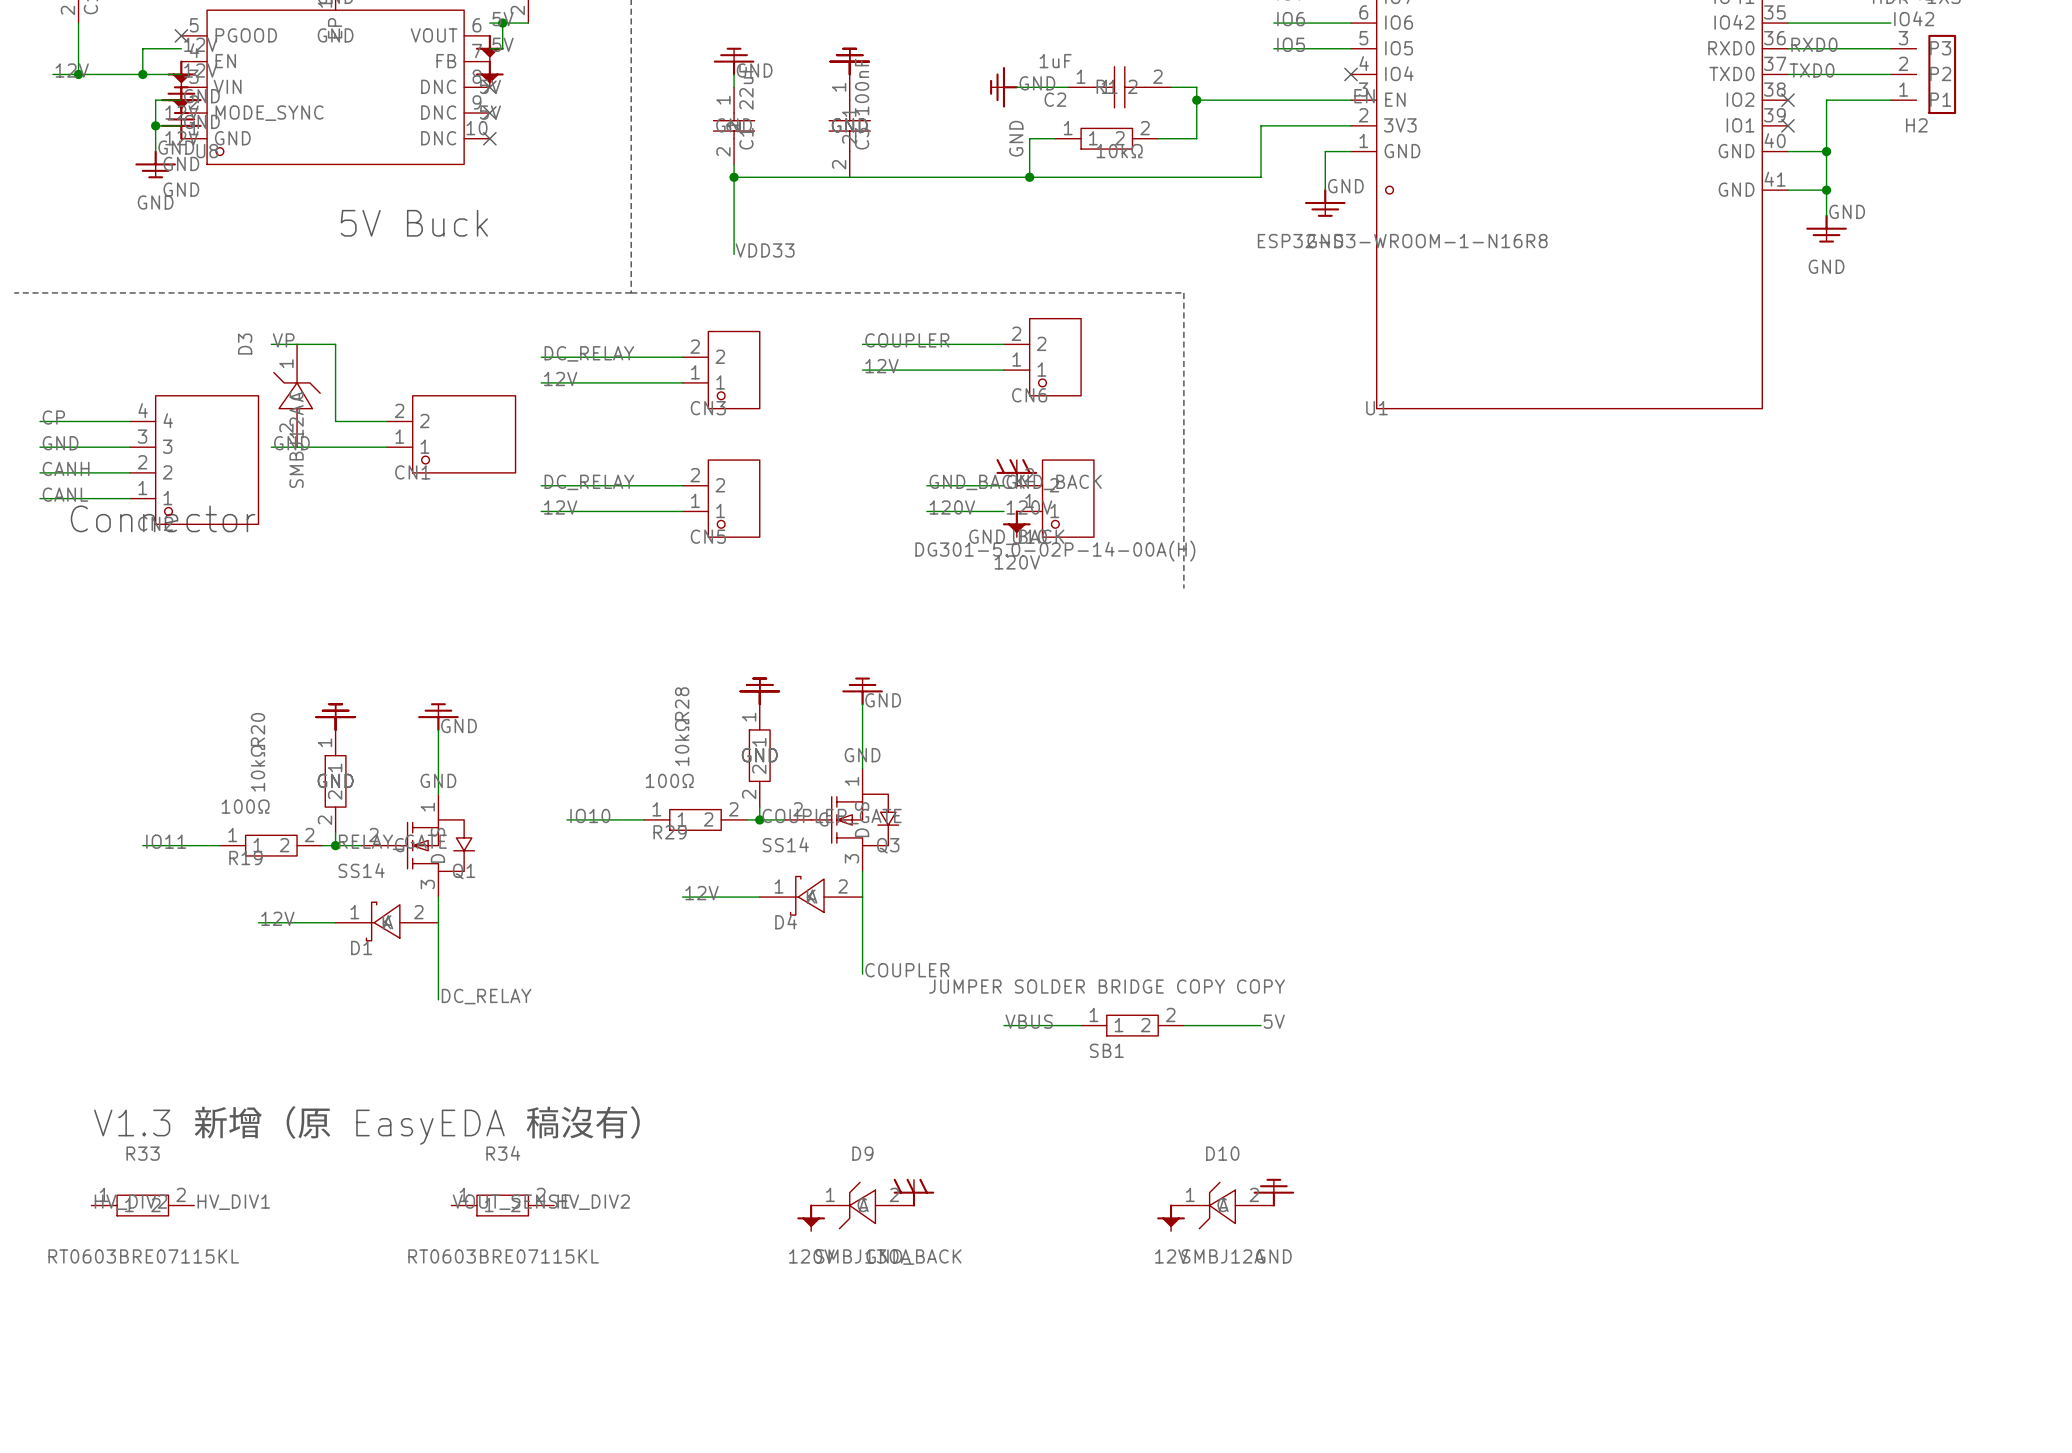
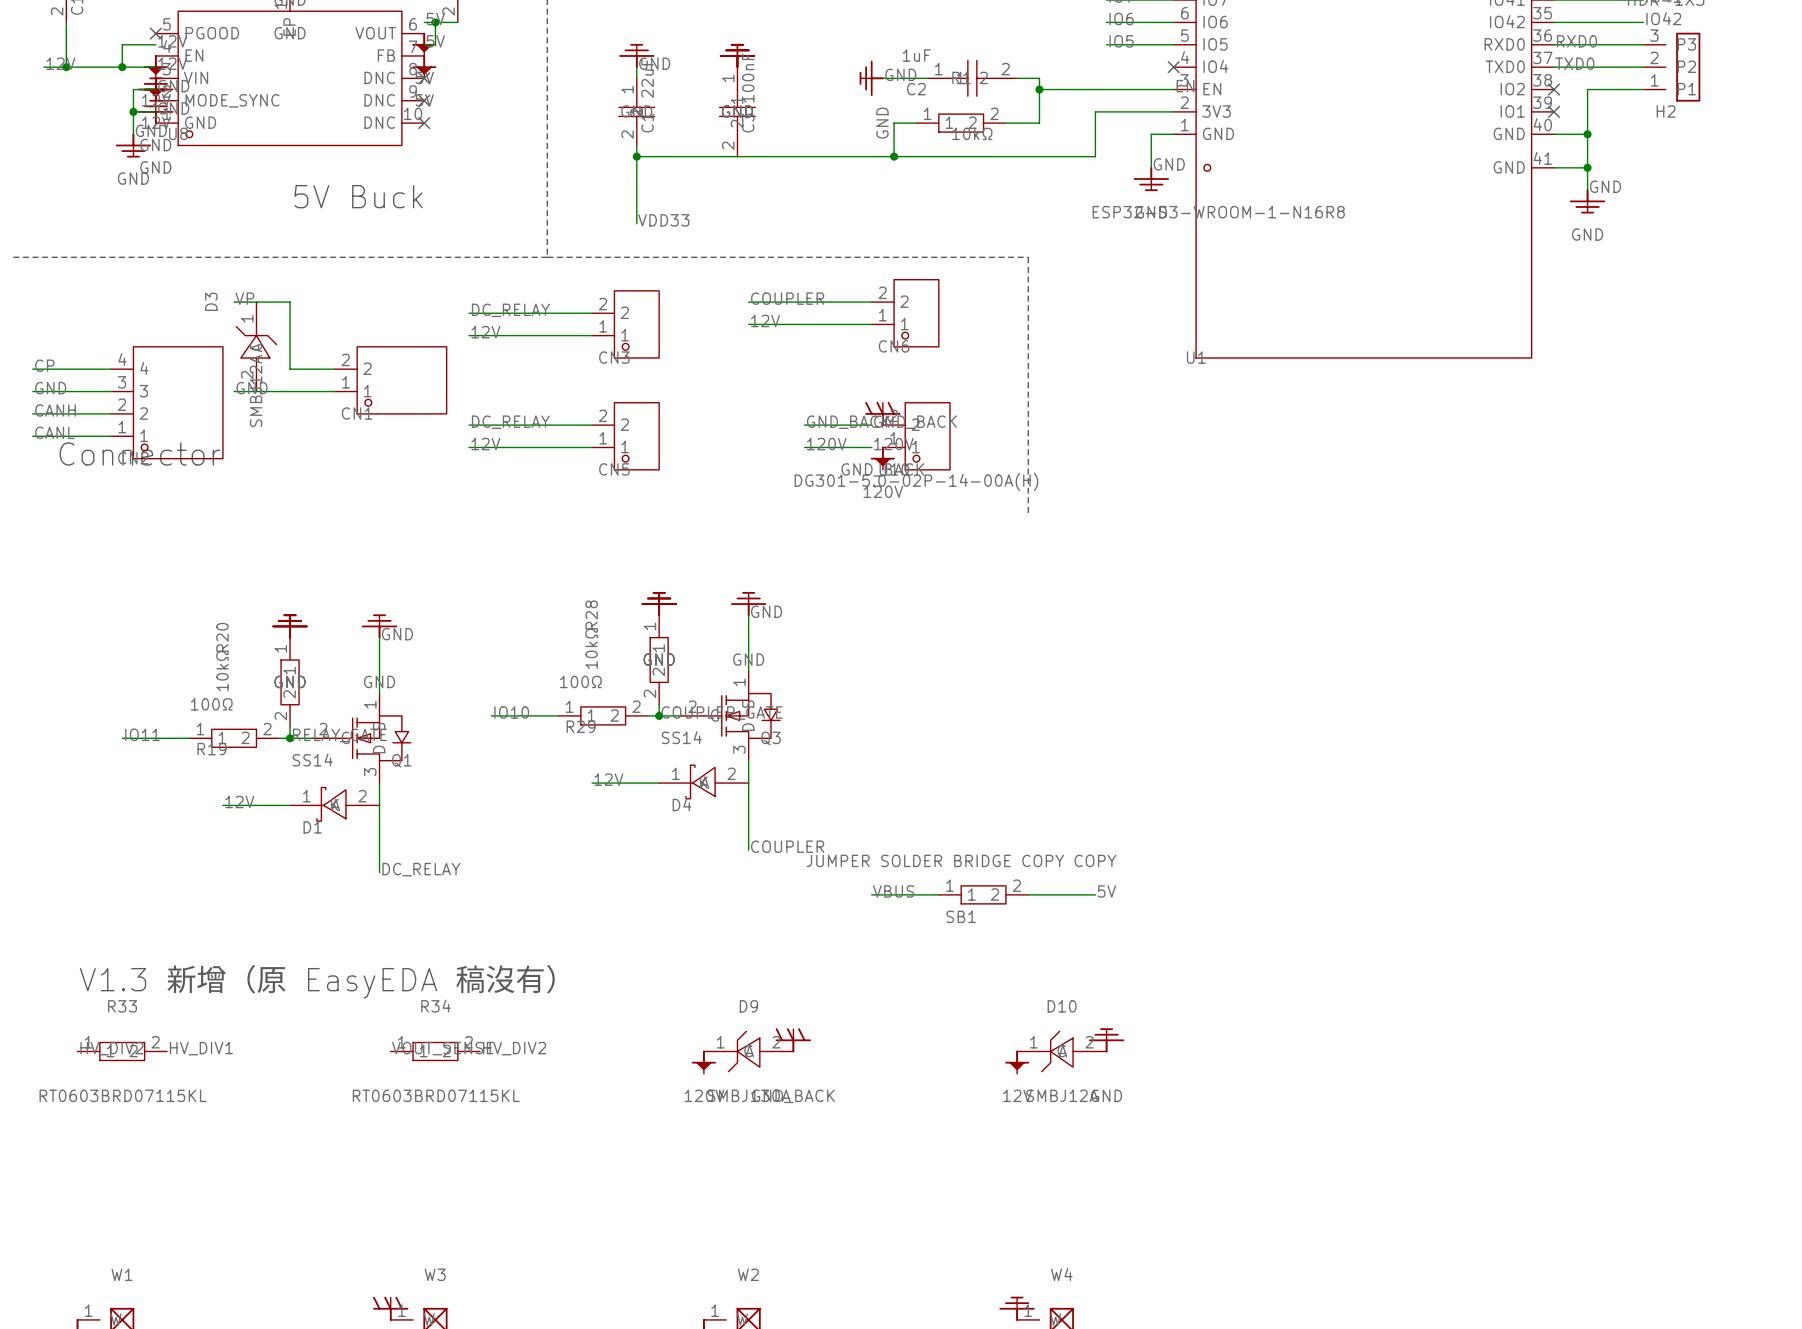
R33 value: RT0603BRE07115KL (143, 1256) -> RT0603BRD07115KL (123, 1095)
R34 value: RT0603BRE07115KL (503, 1256) -> RT0603BRD07115KL (436, 1095)

